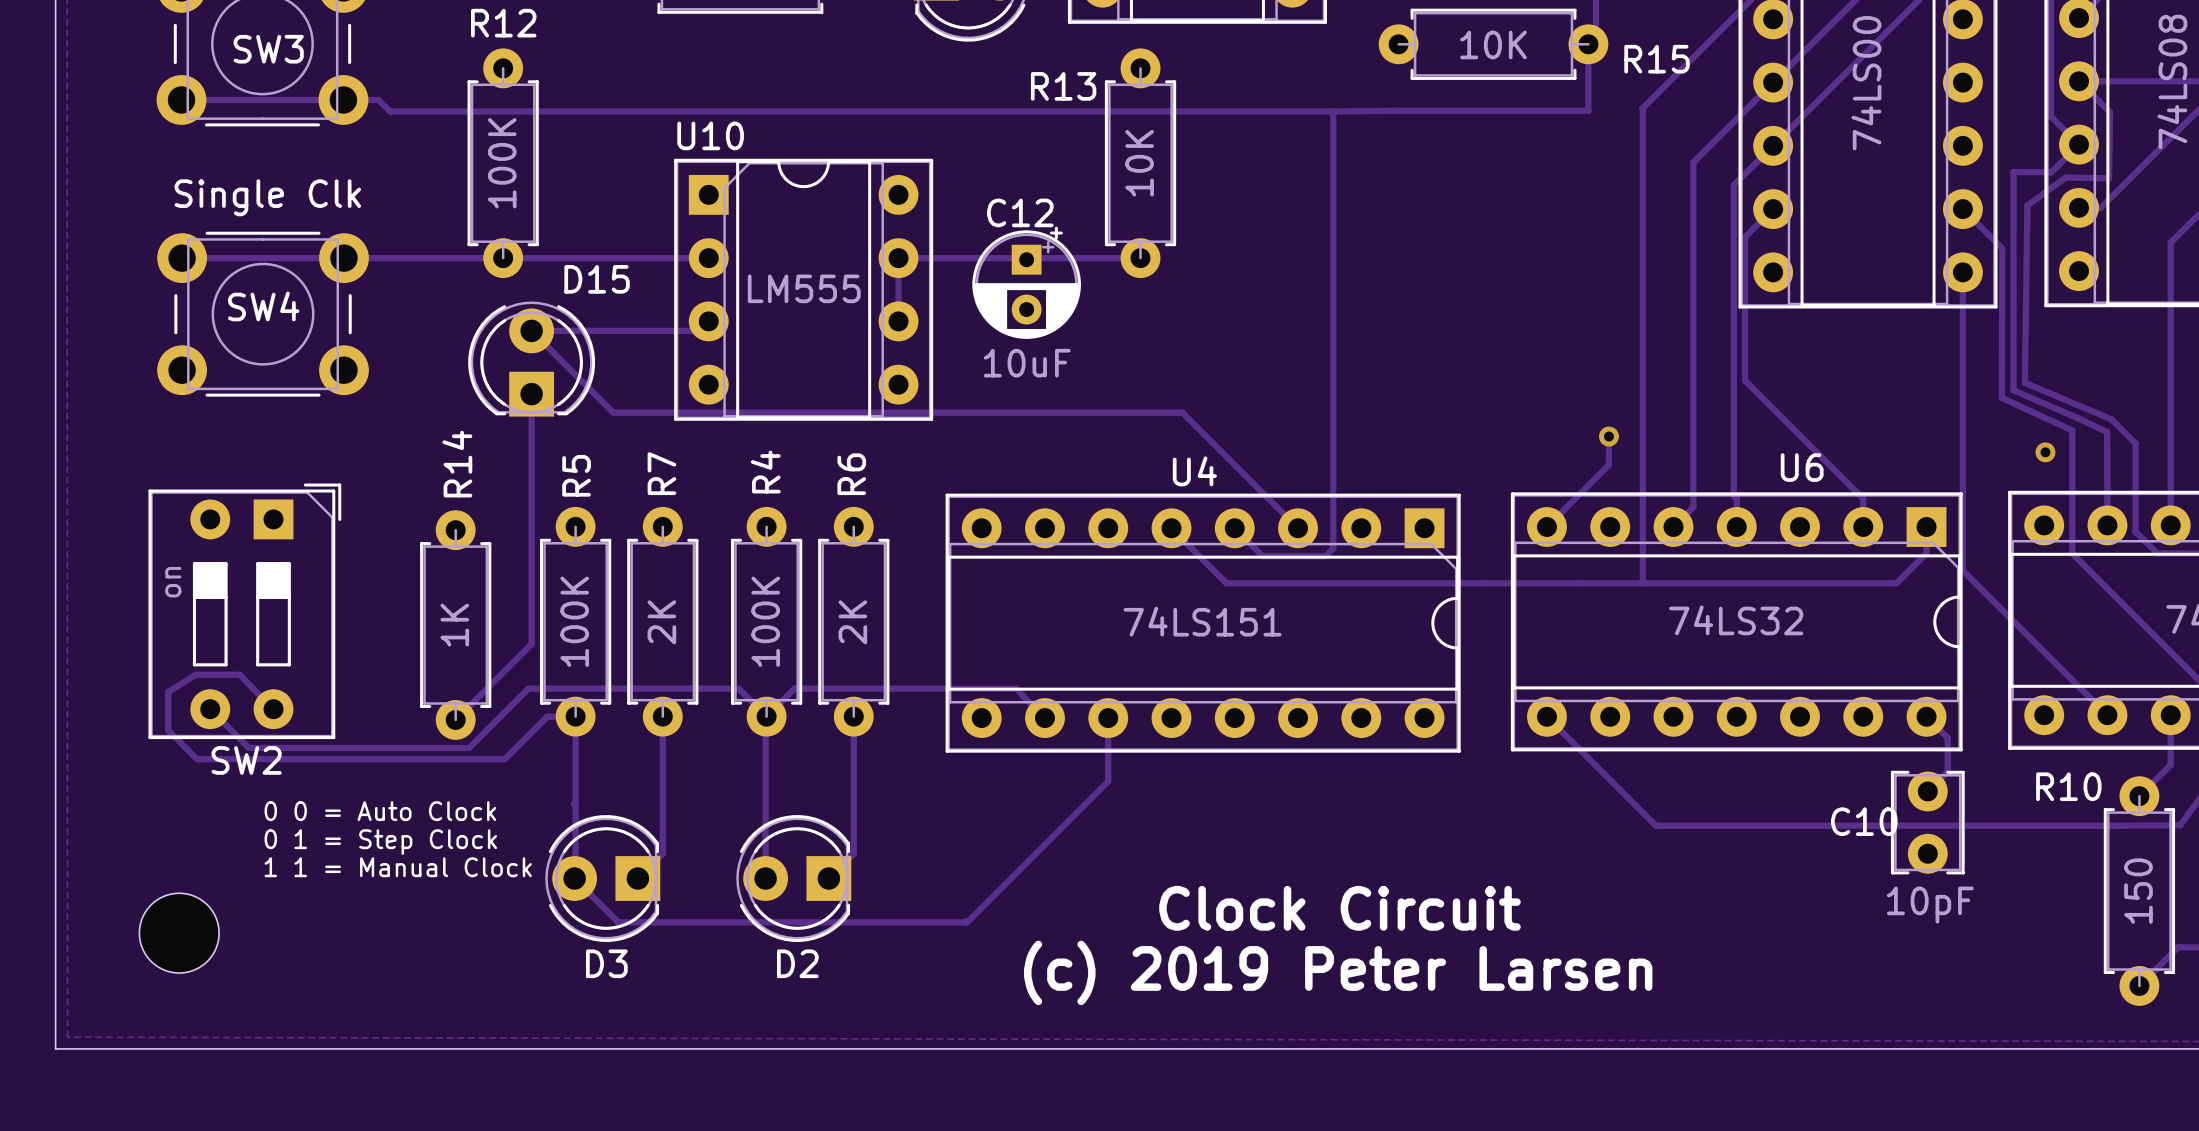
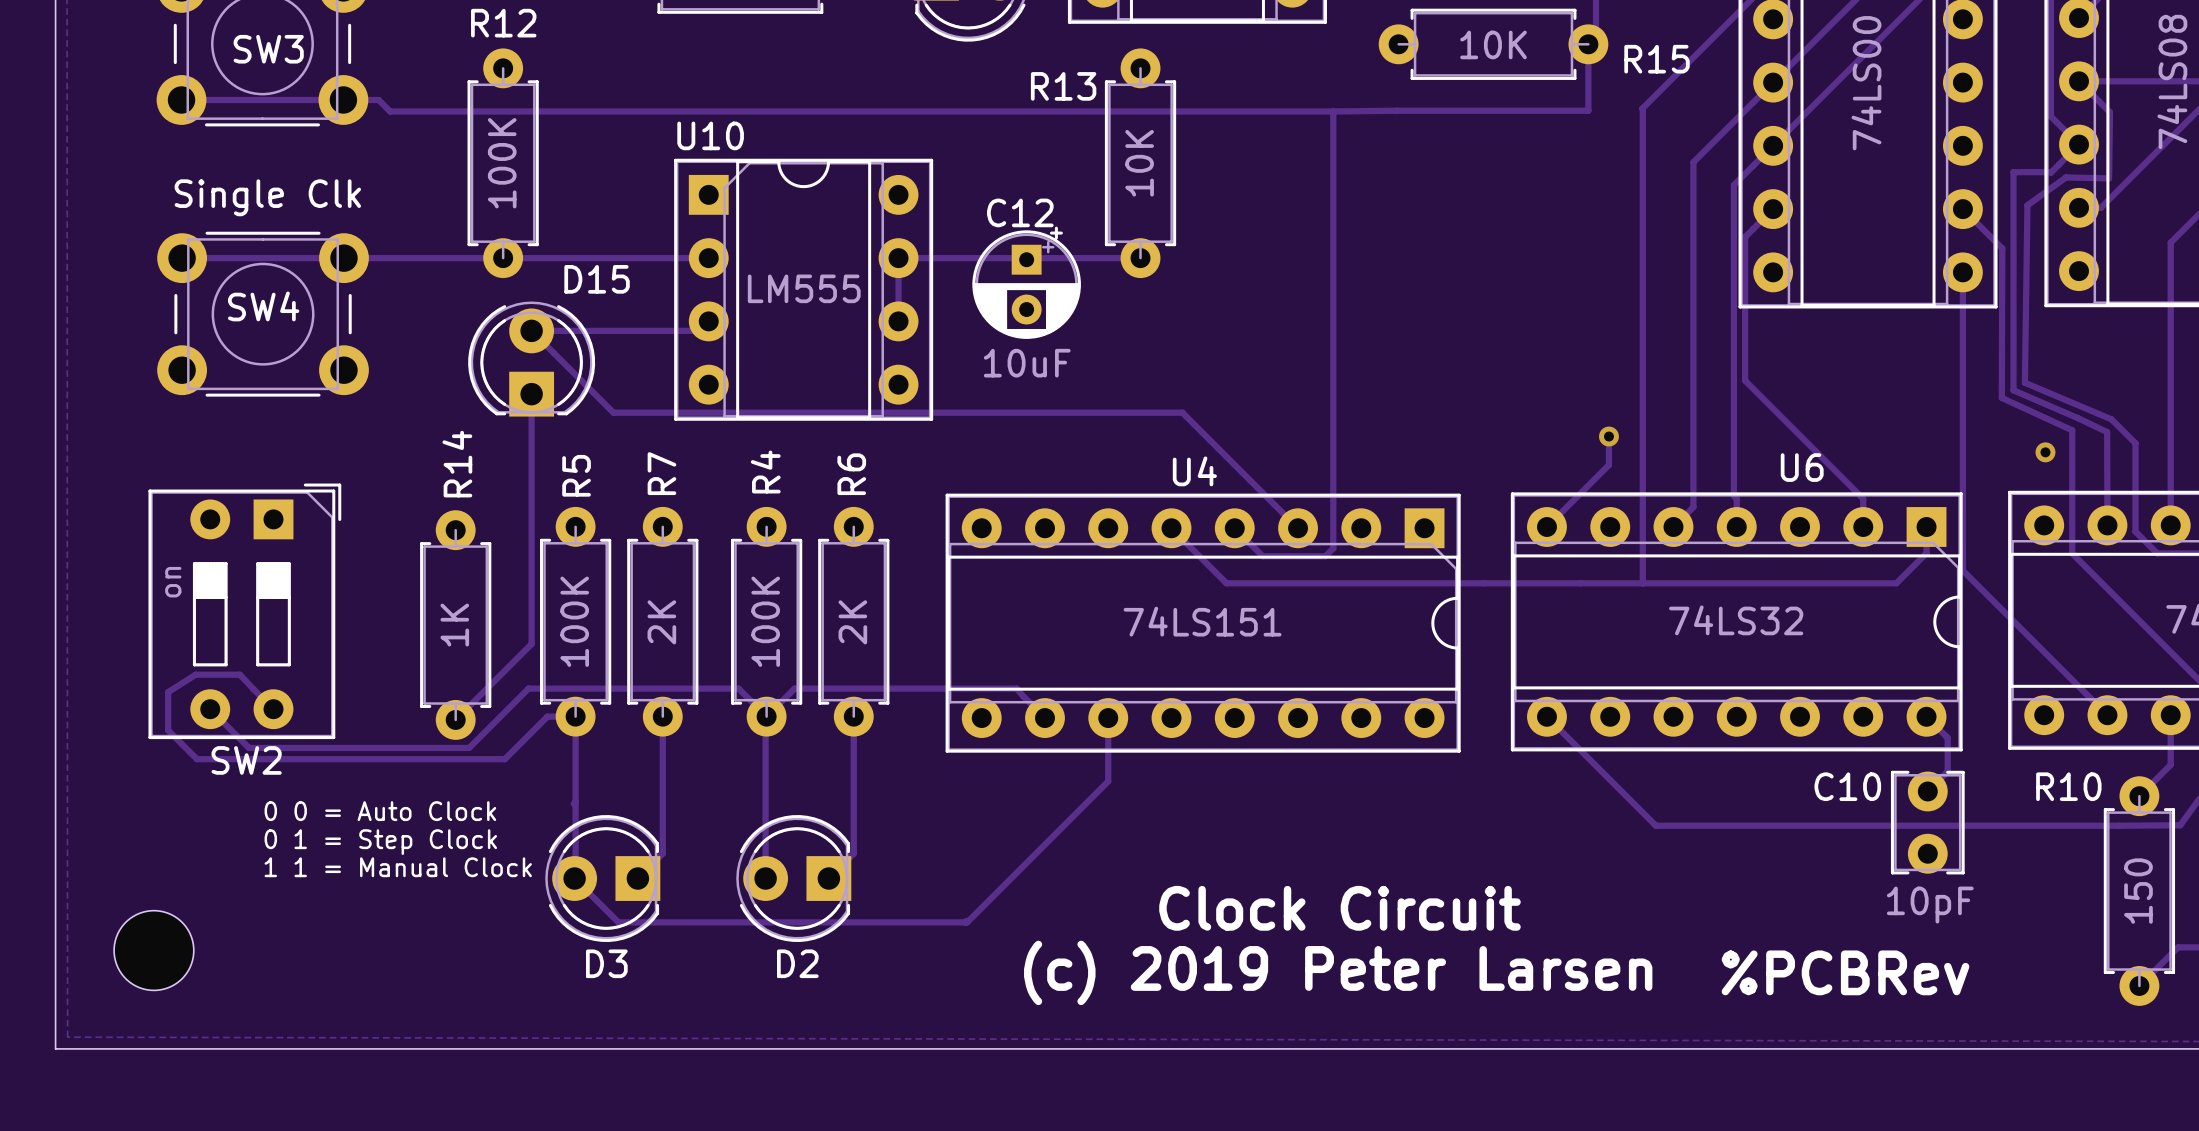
C10 name position: C10 (1864, 821) -> C10 (1847, 786)
part position: (179, 933) -> (153, 950)
text: none -> %PCBRev (1845, 972)

